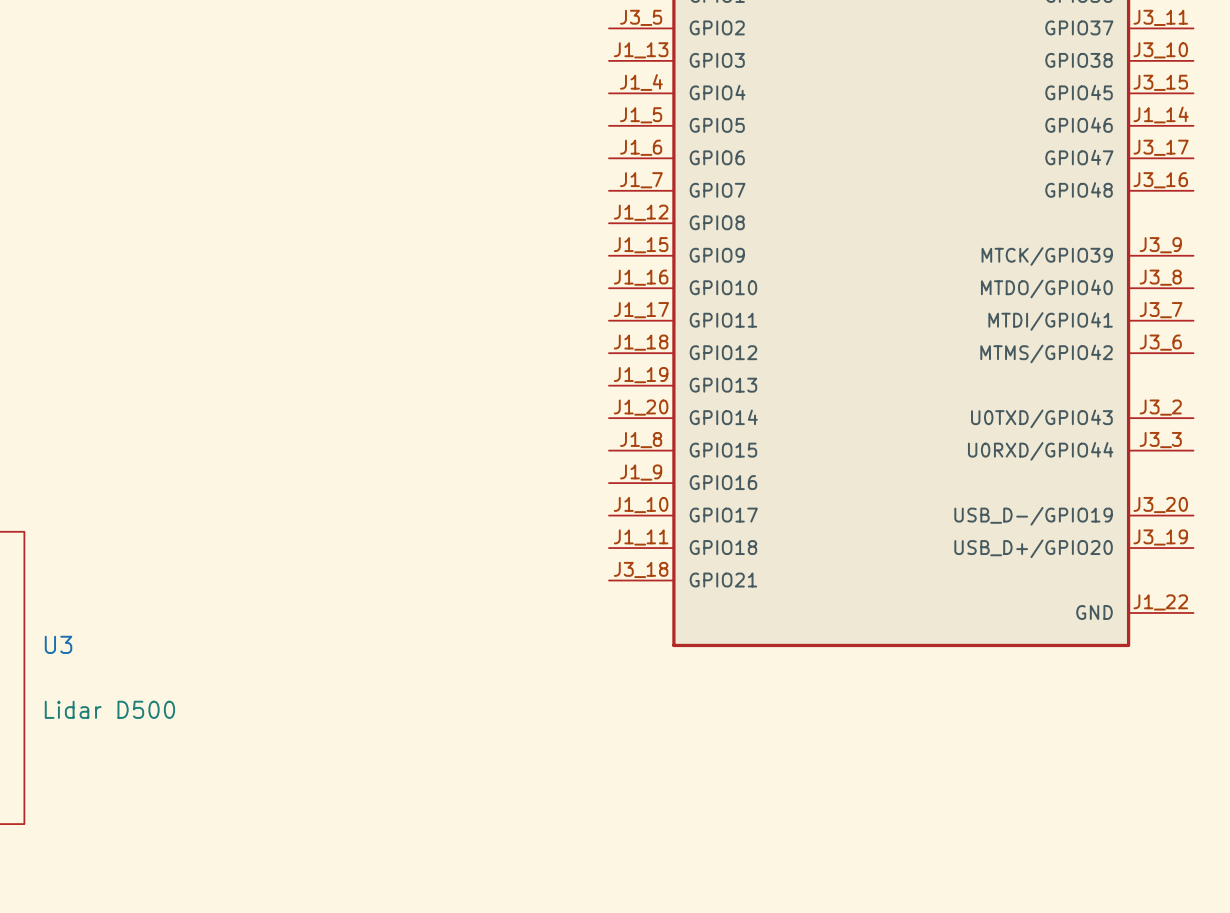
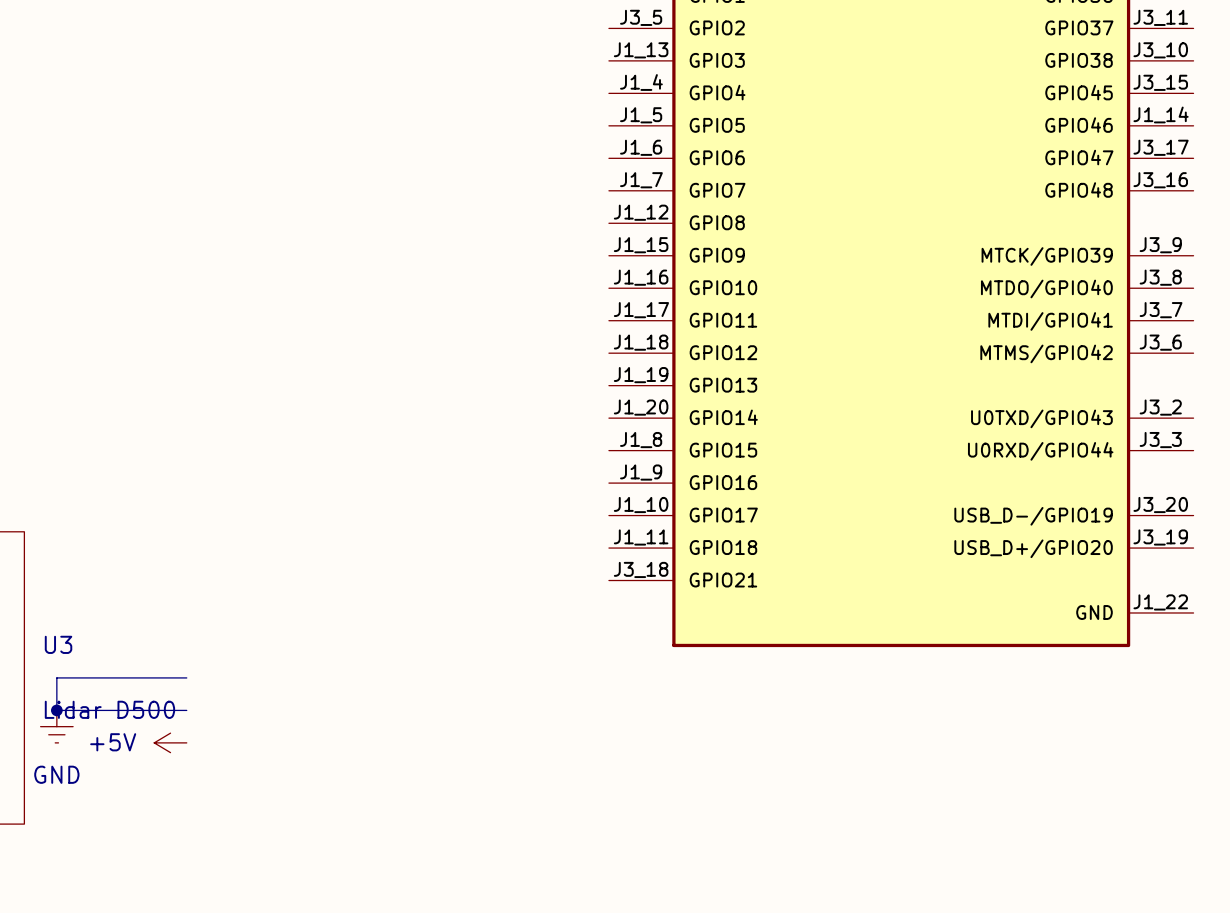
wire: none -> (186, 677) (56, 677) (56, 710) (186, 710)
junction: none -> (56, 710)
power symbol: none -> GND (56, 726)
power symbol: none -> +5V (170, 742)

